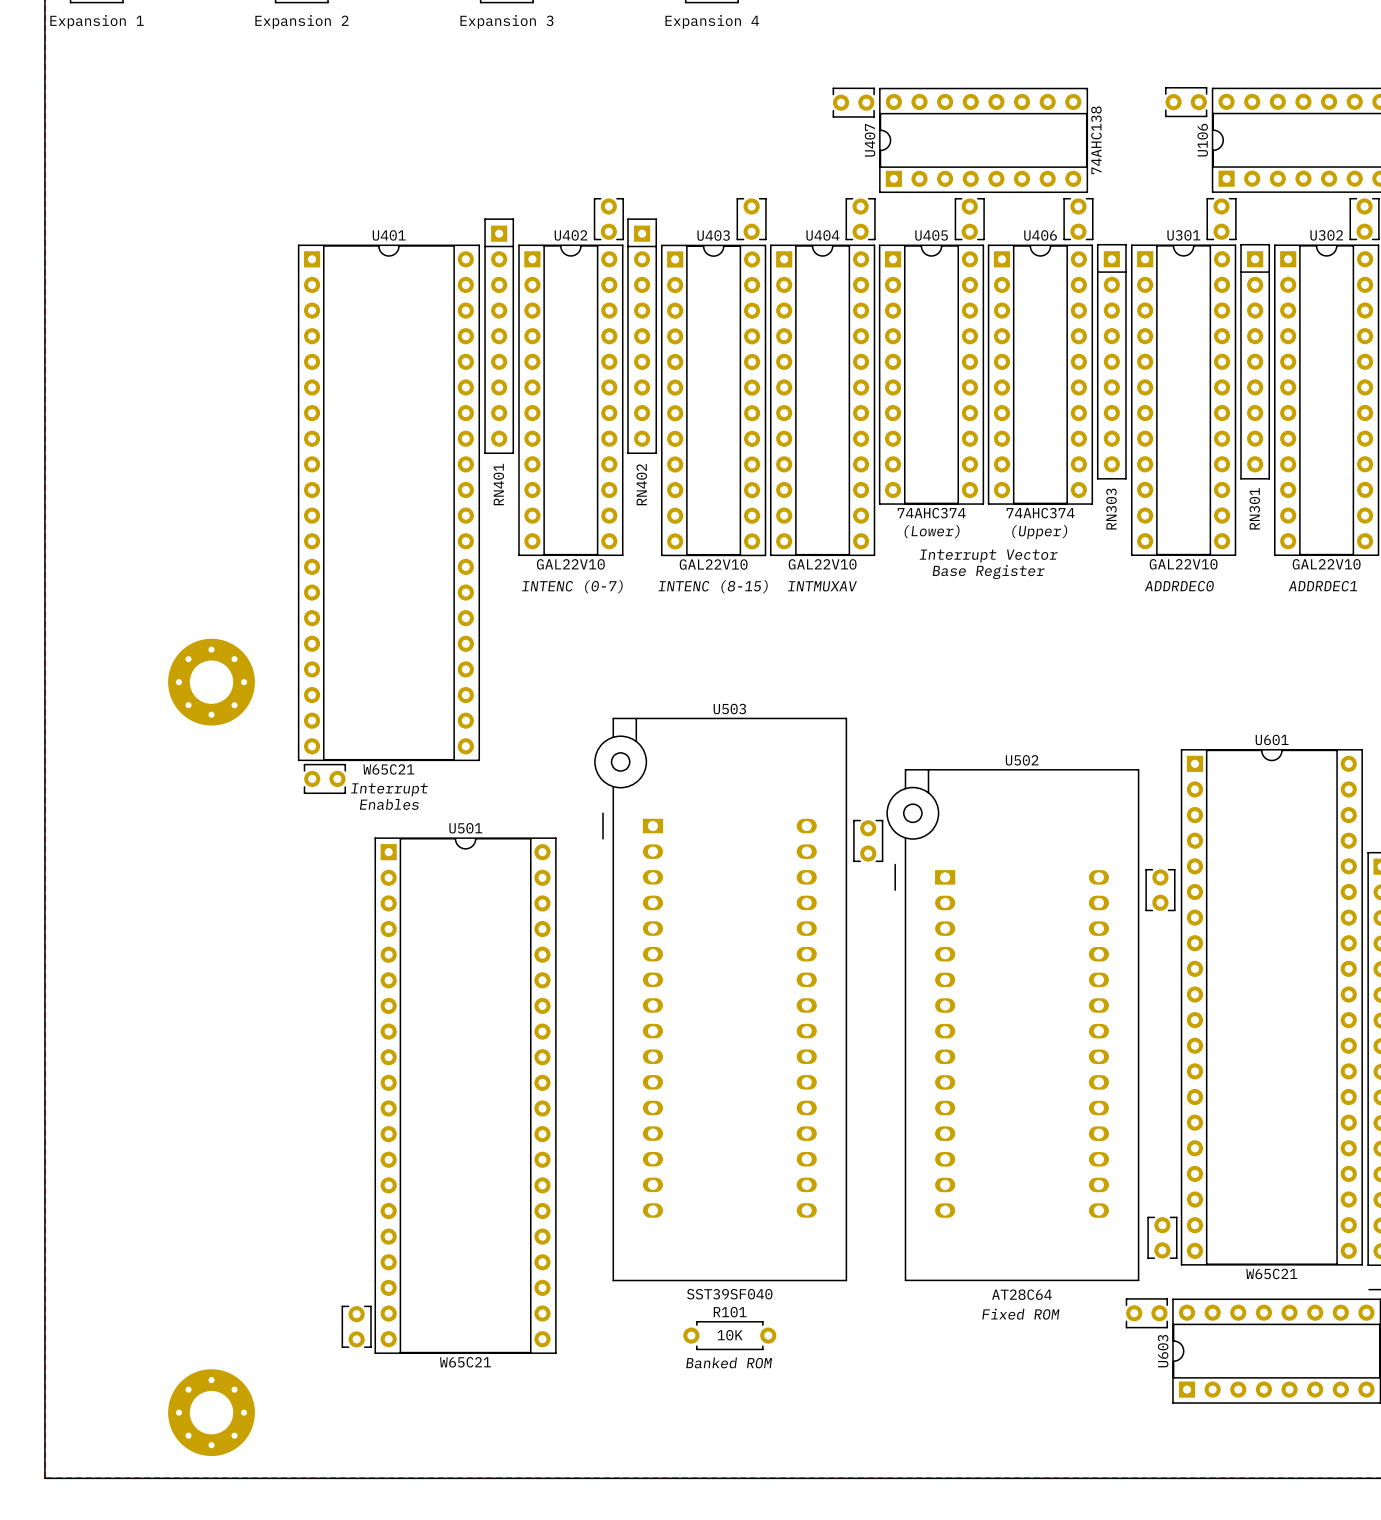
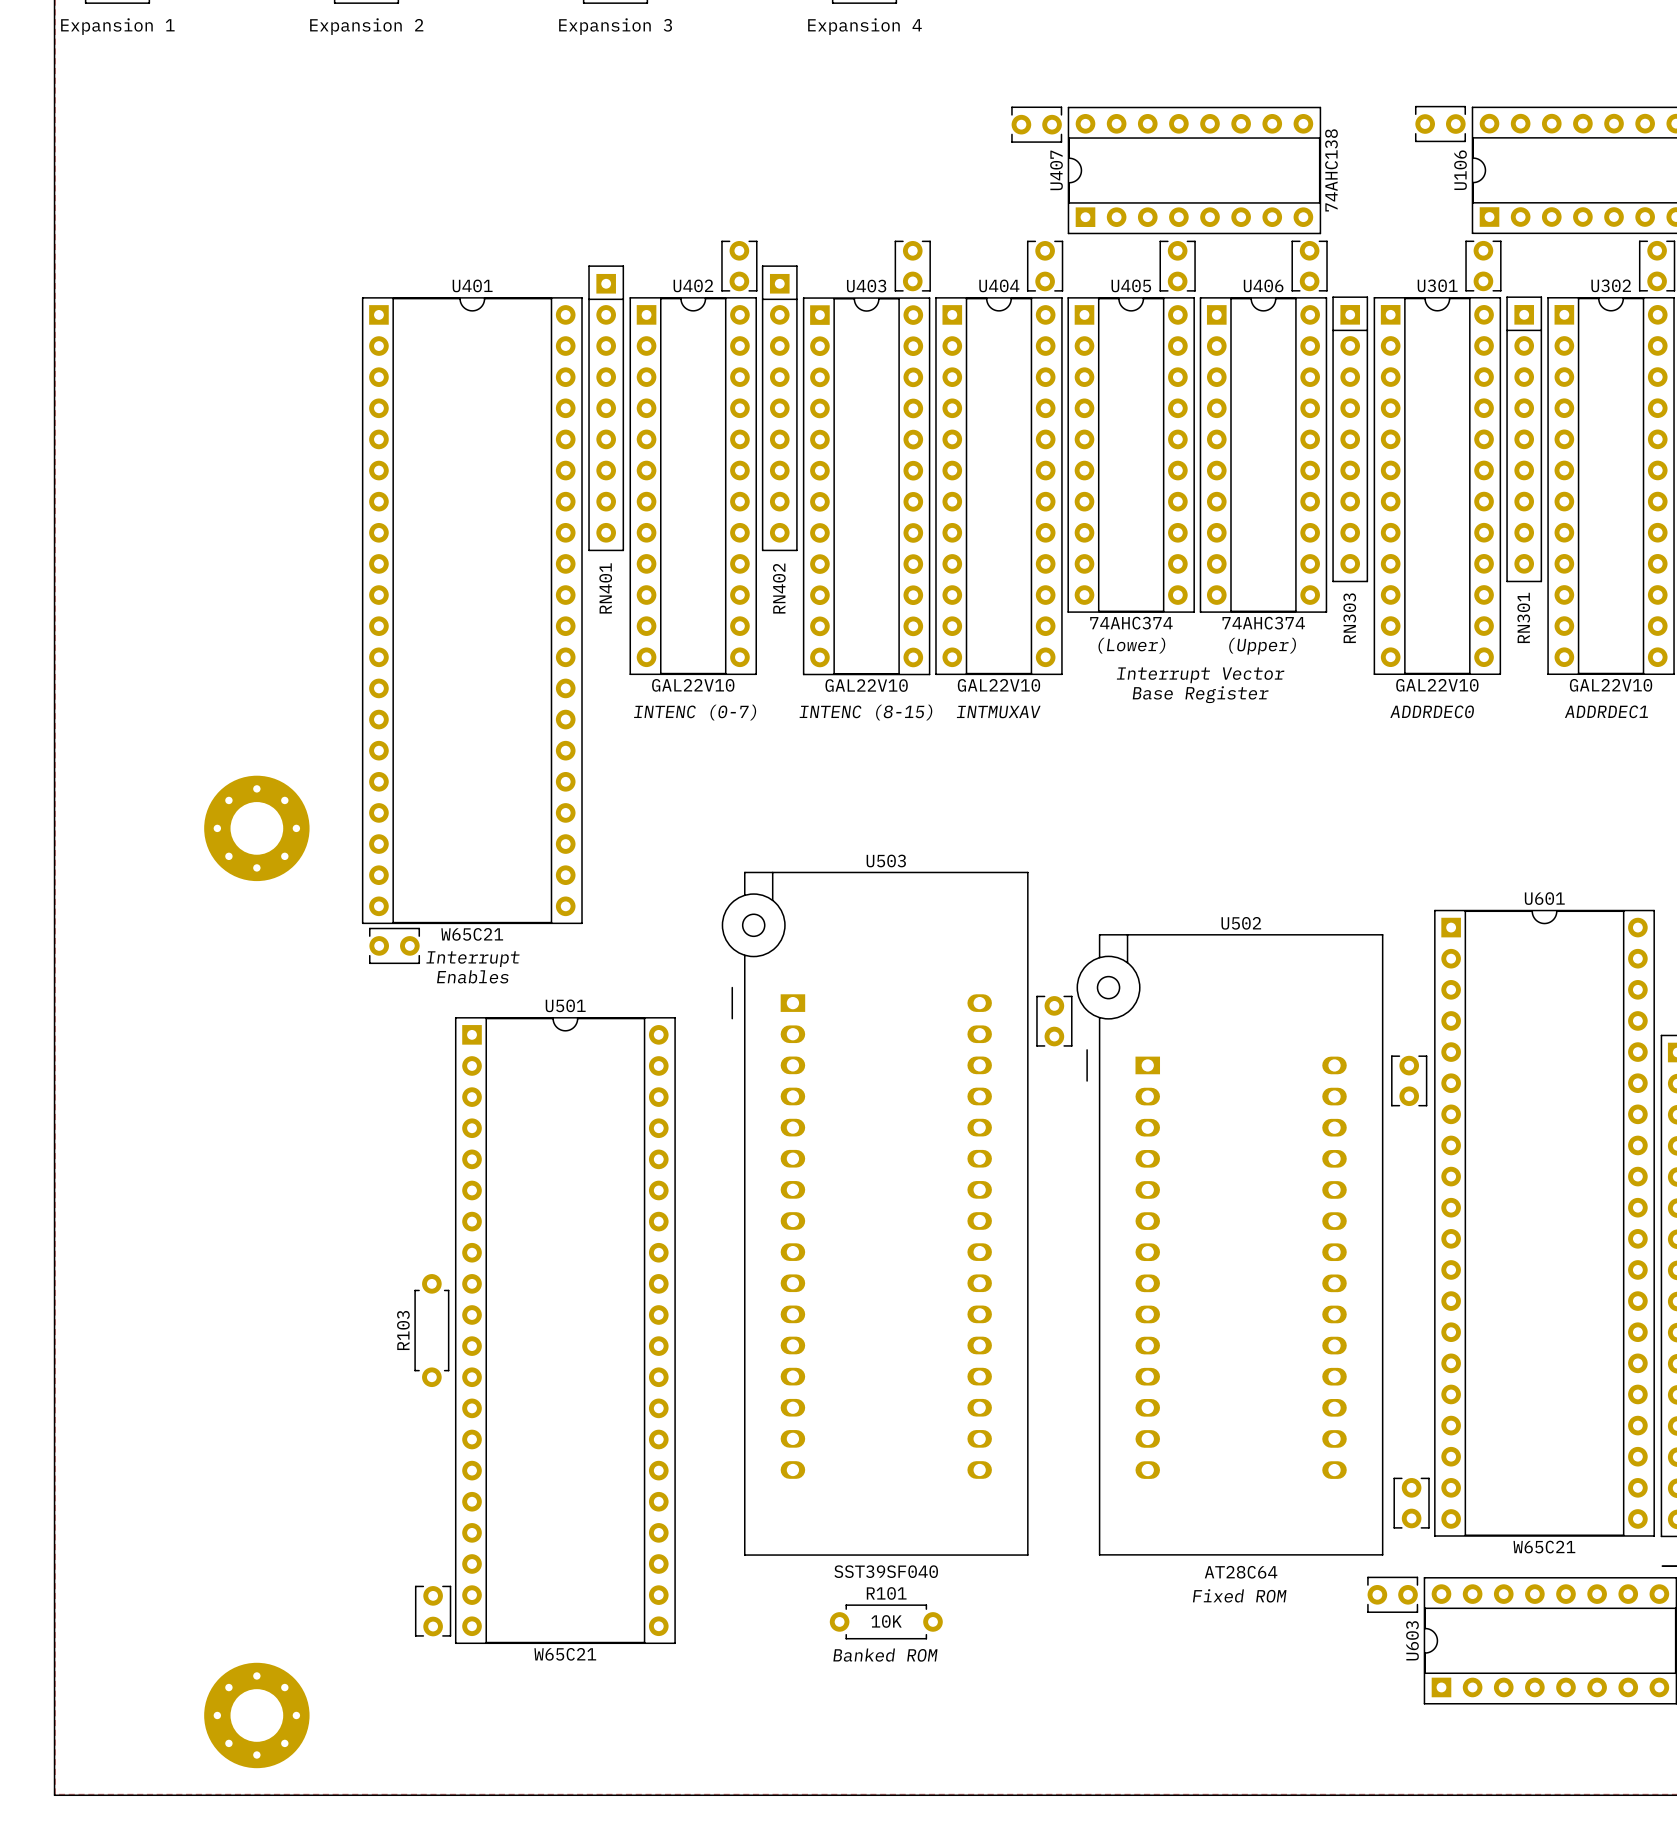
R103: none -> (431, 1330)

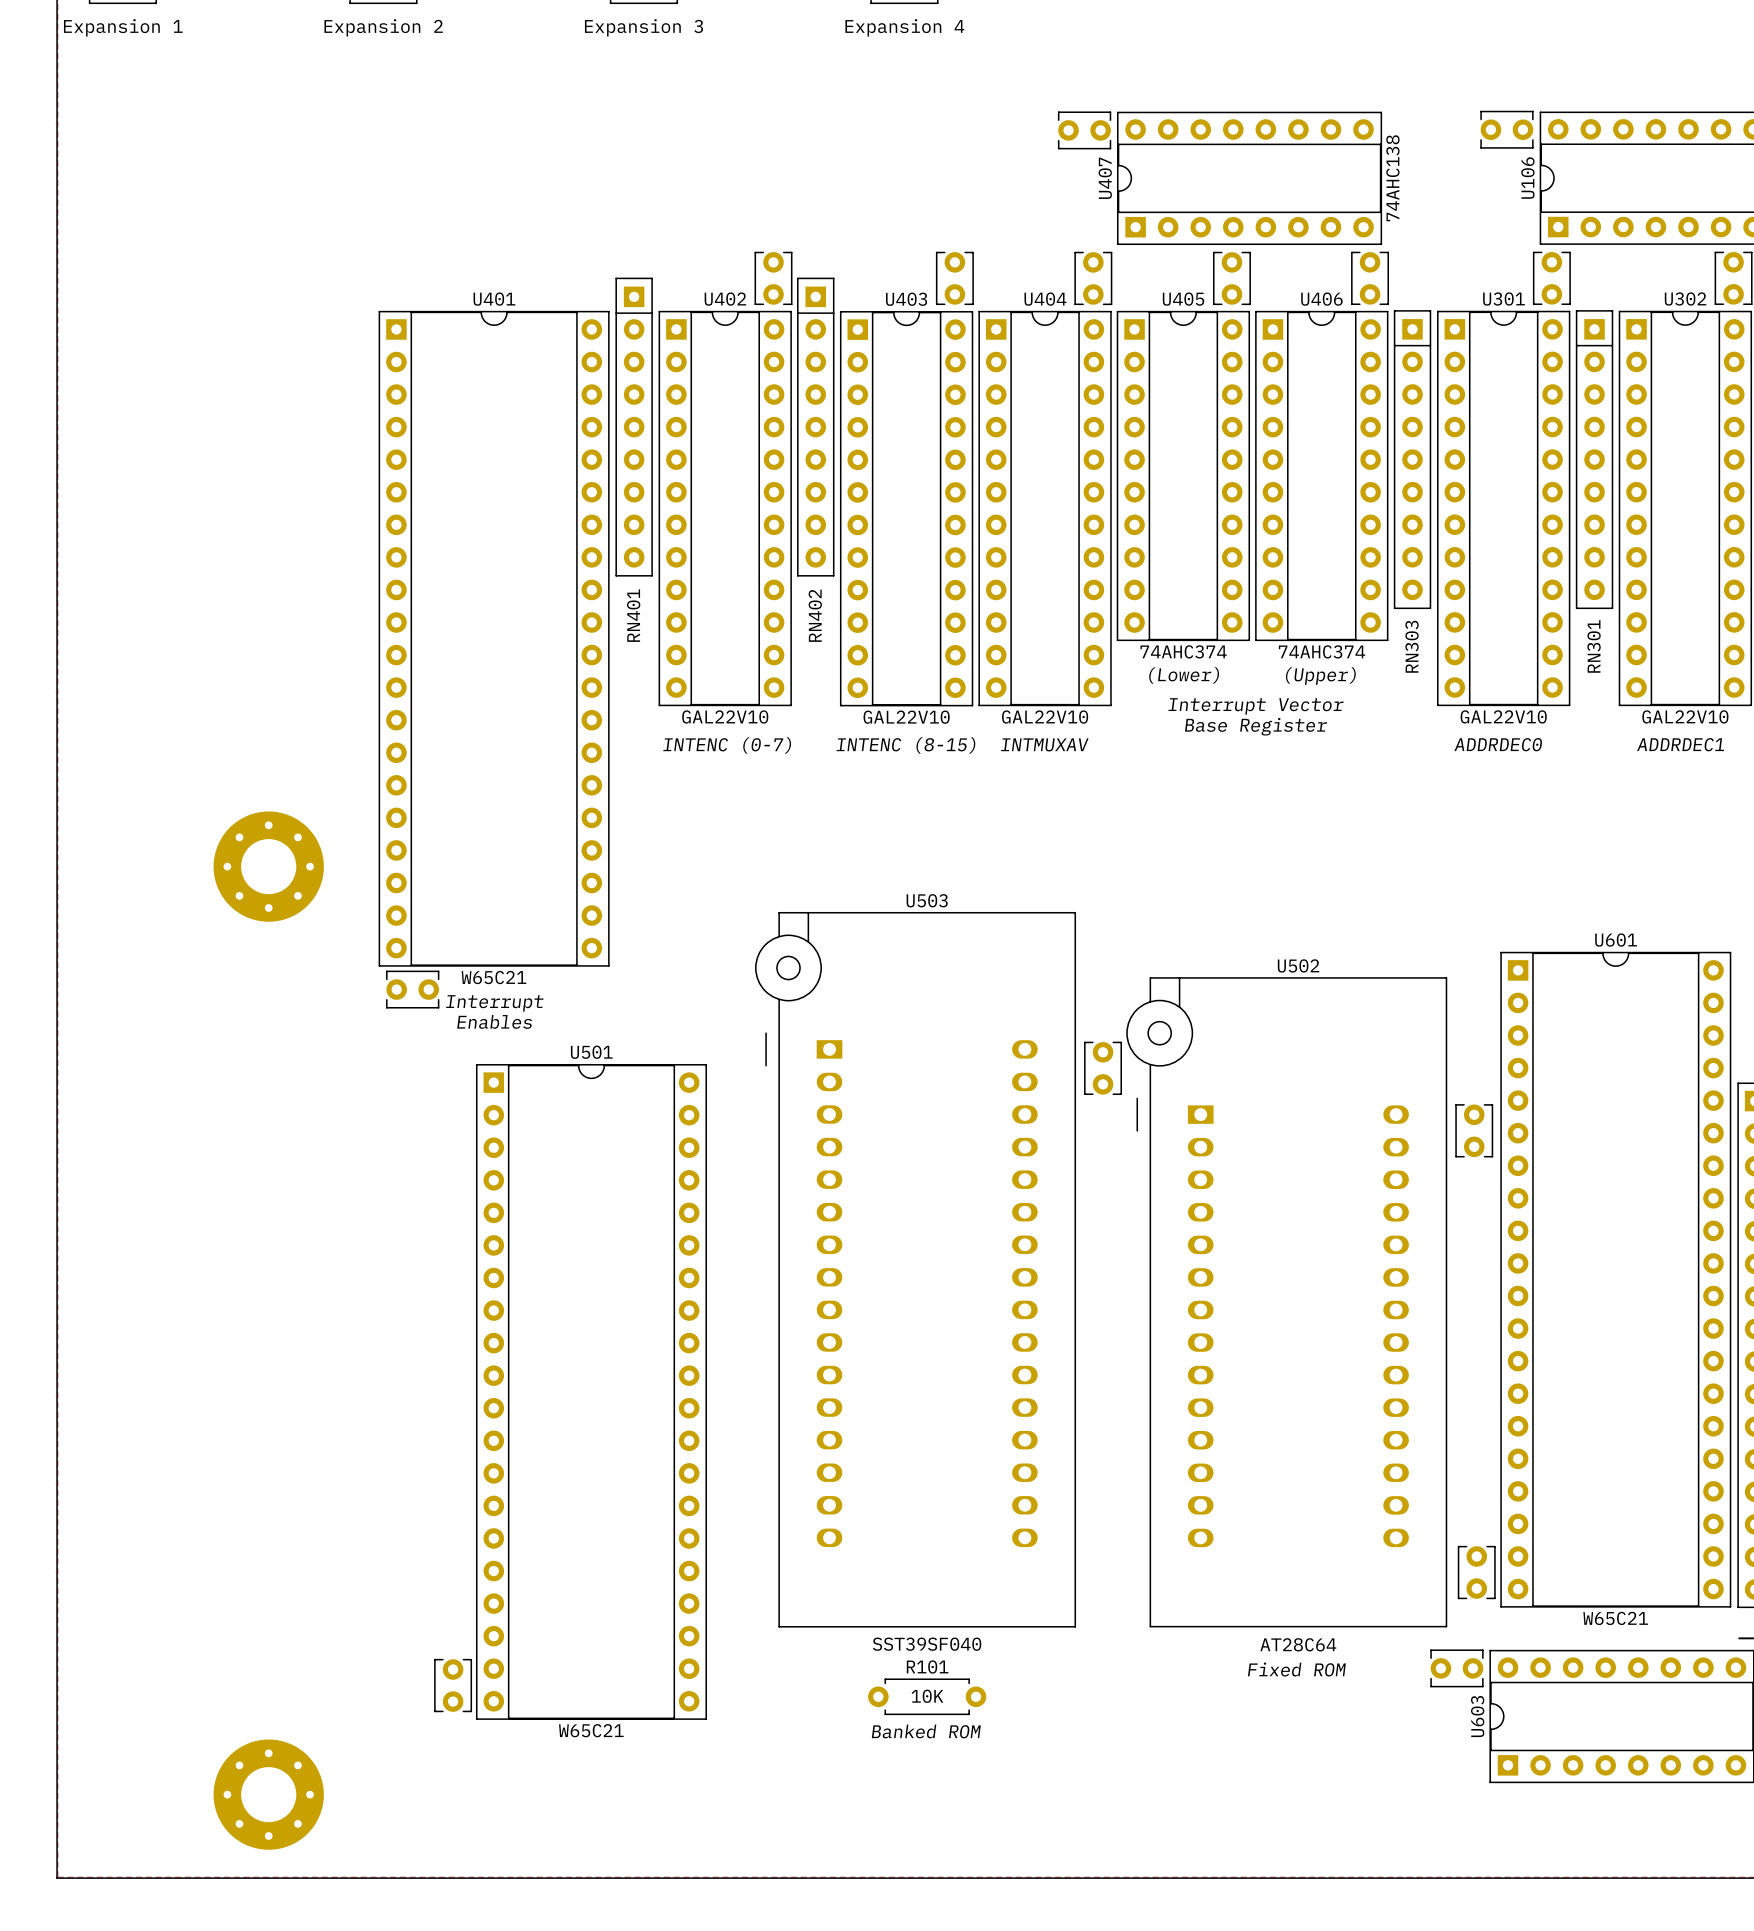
R103: (431, 1330) -> none

